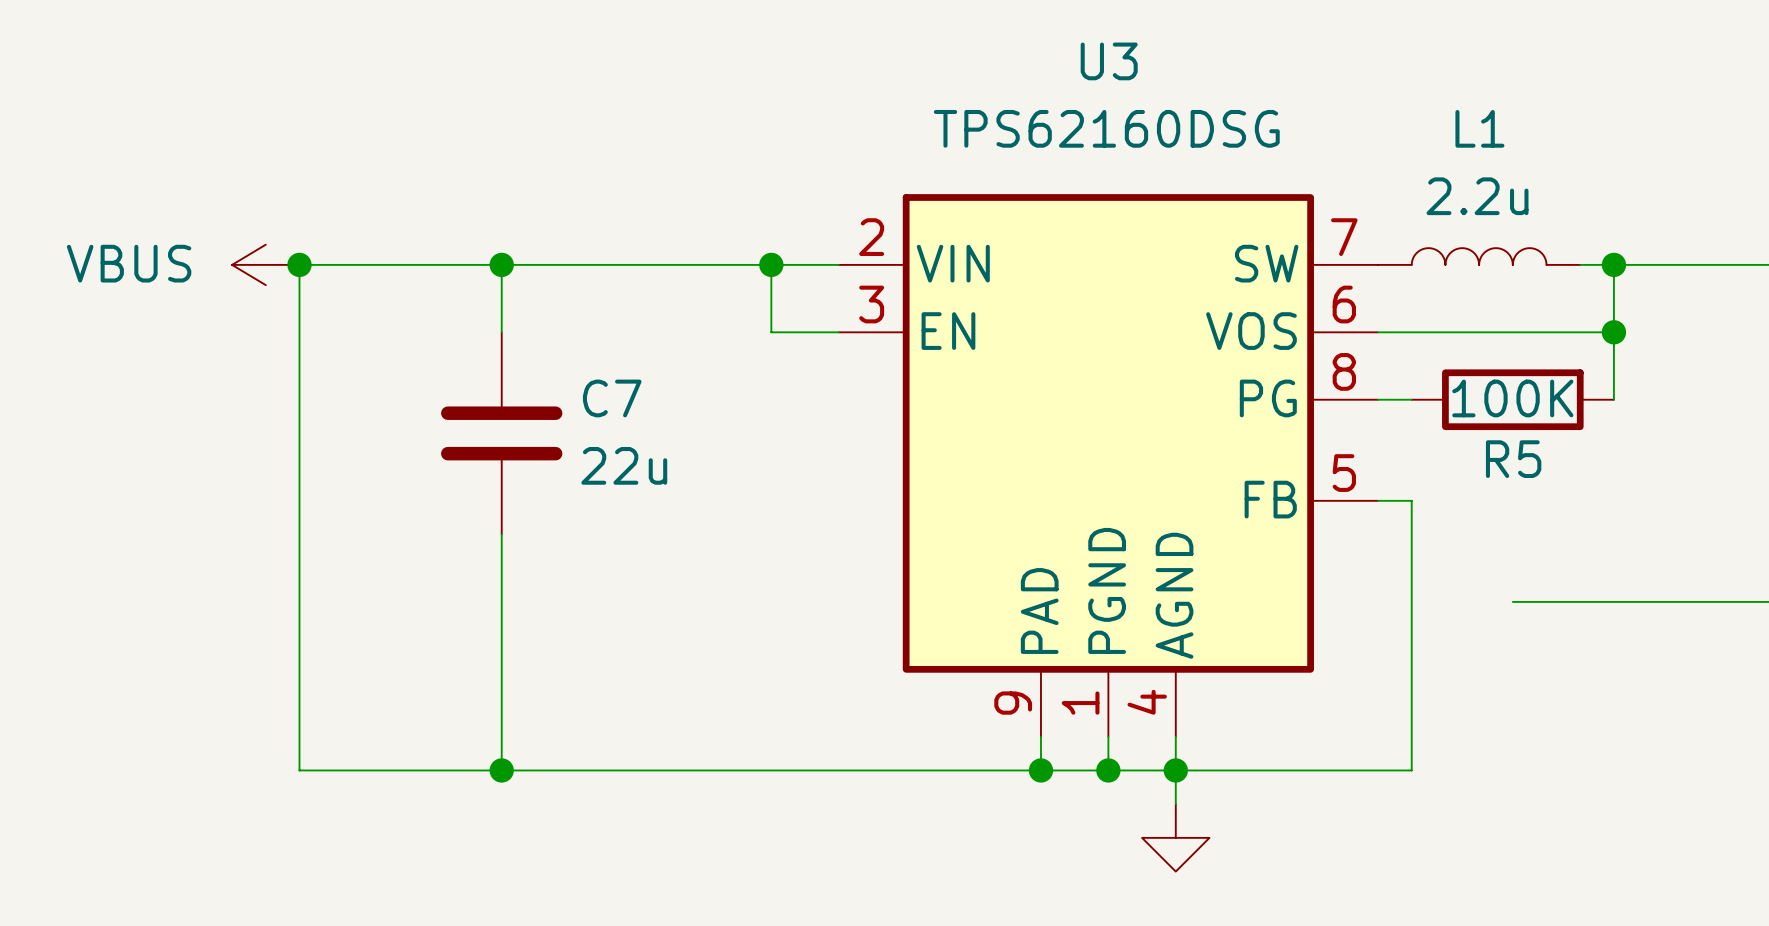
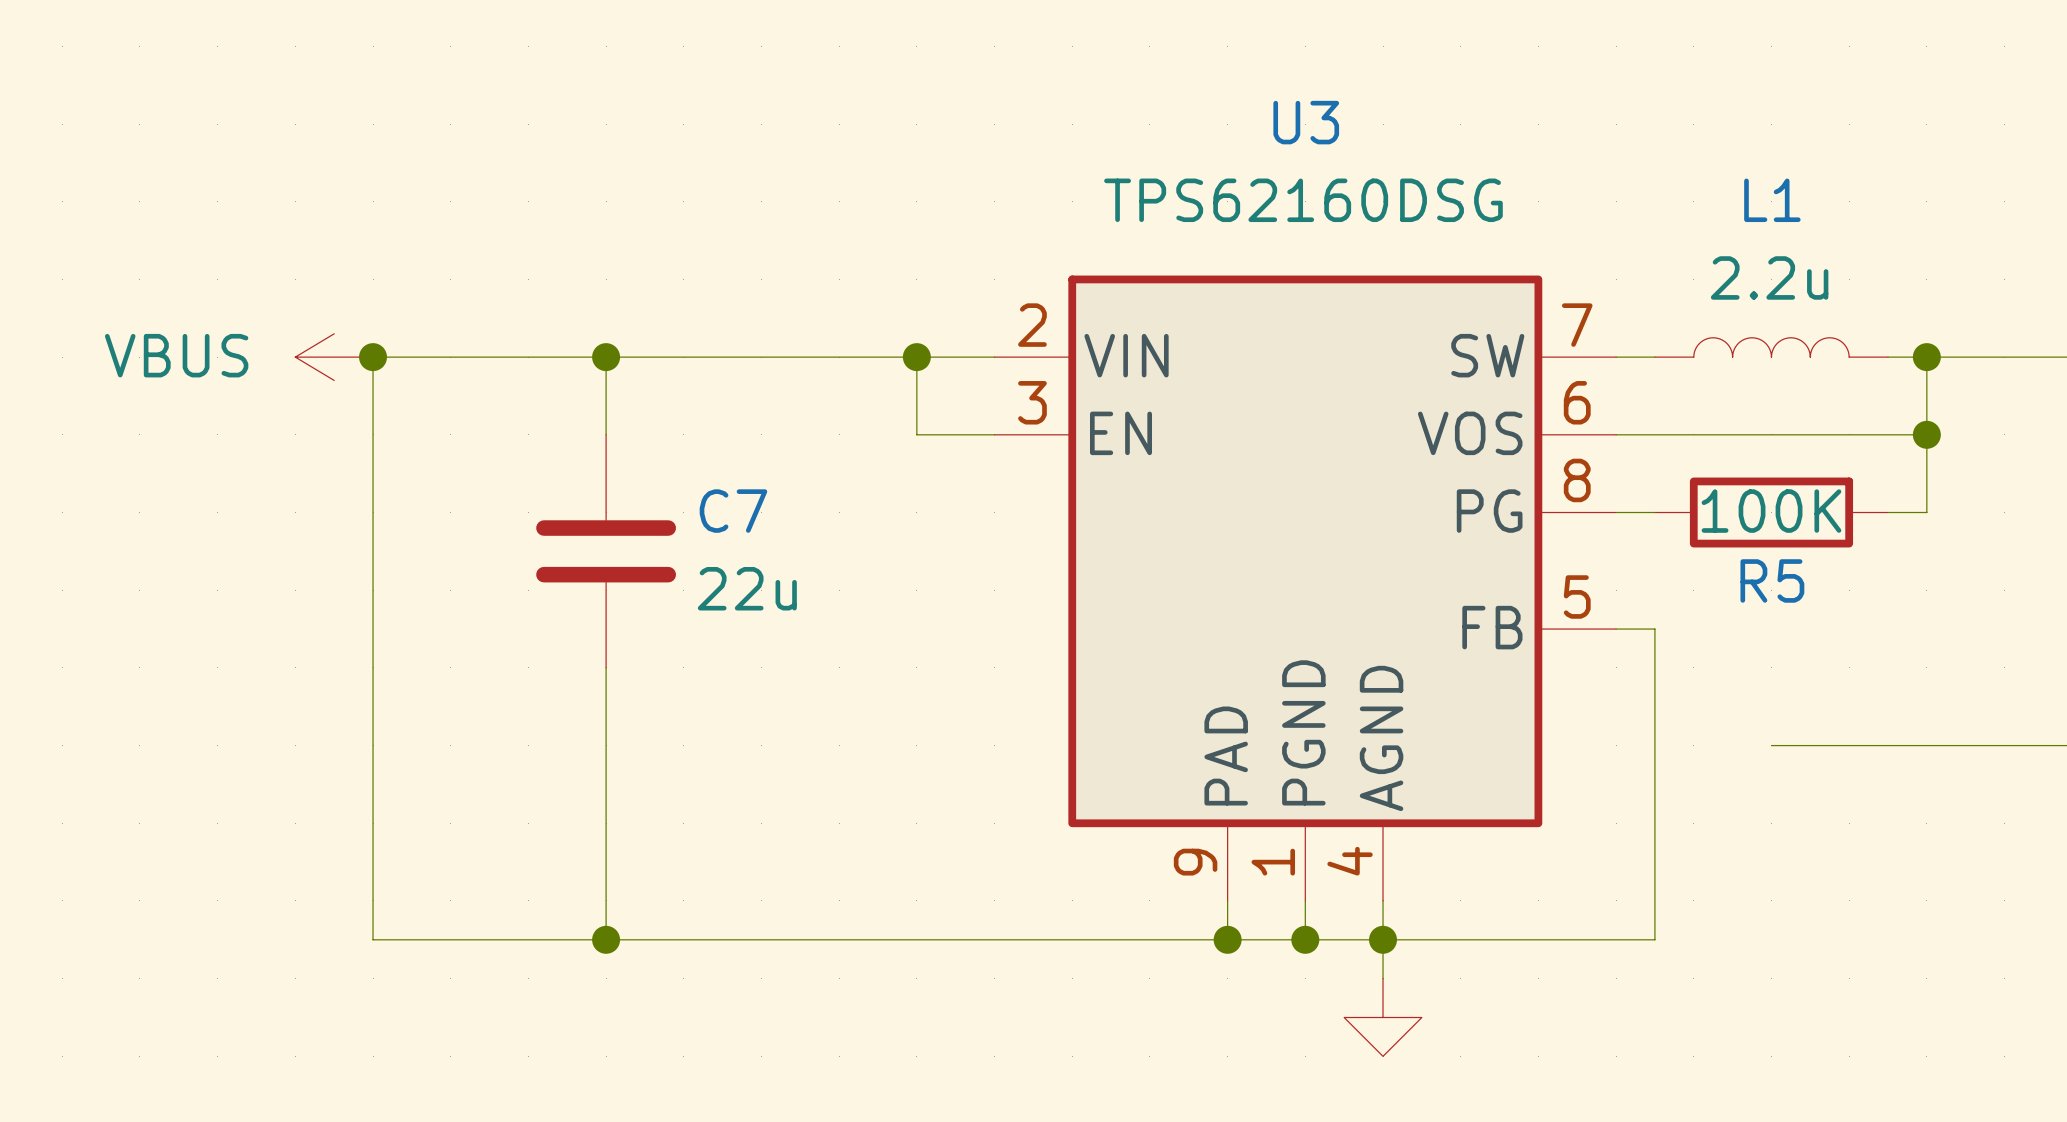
L1 position: (1479, 256) -> (1771, 347)
wire: (1580, 264) (1613, 264) (1613, 399) -> (1926, 357) (1926, 512) (1888, 512)
junction position: (1613, 264) -> (1926, 357)
wire: none -> (1888, 434) (1926, 434)
junction position: (1613, 332) -> (1926, 434)

